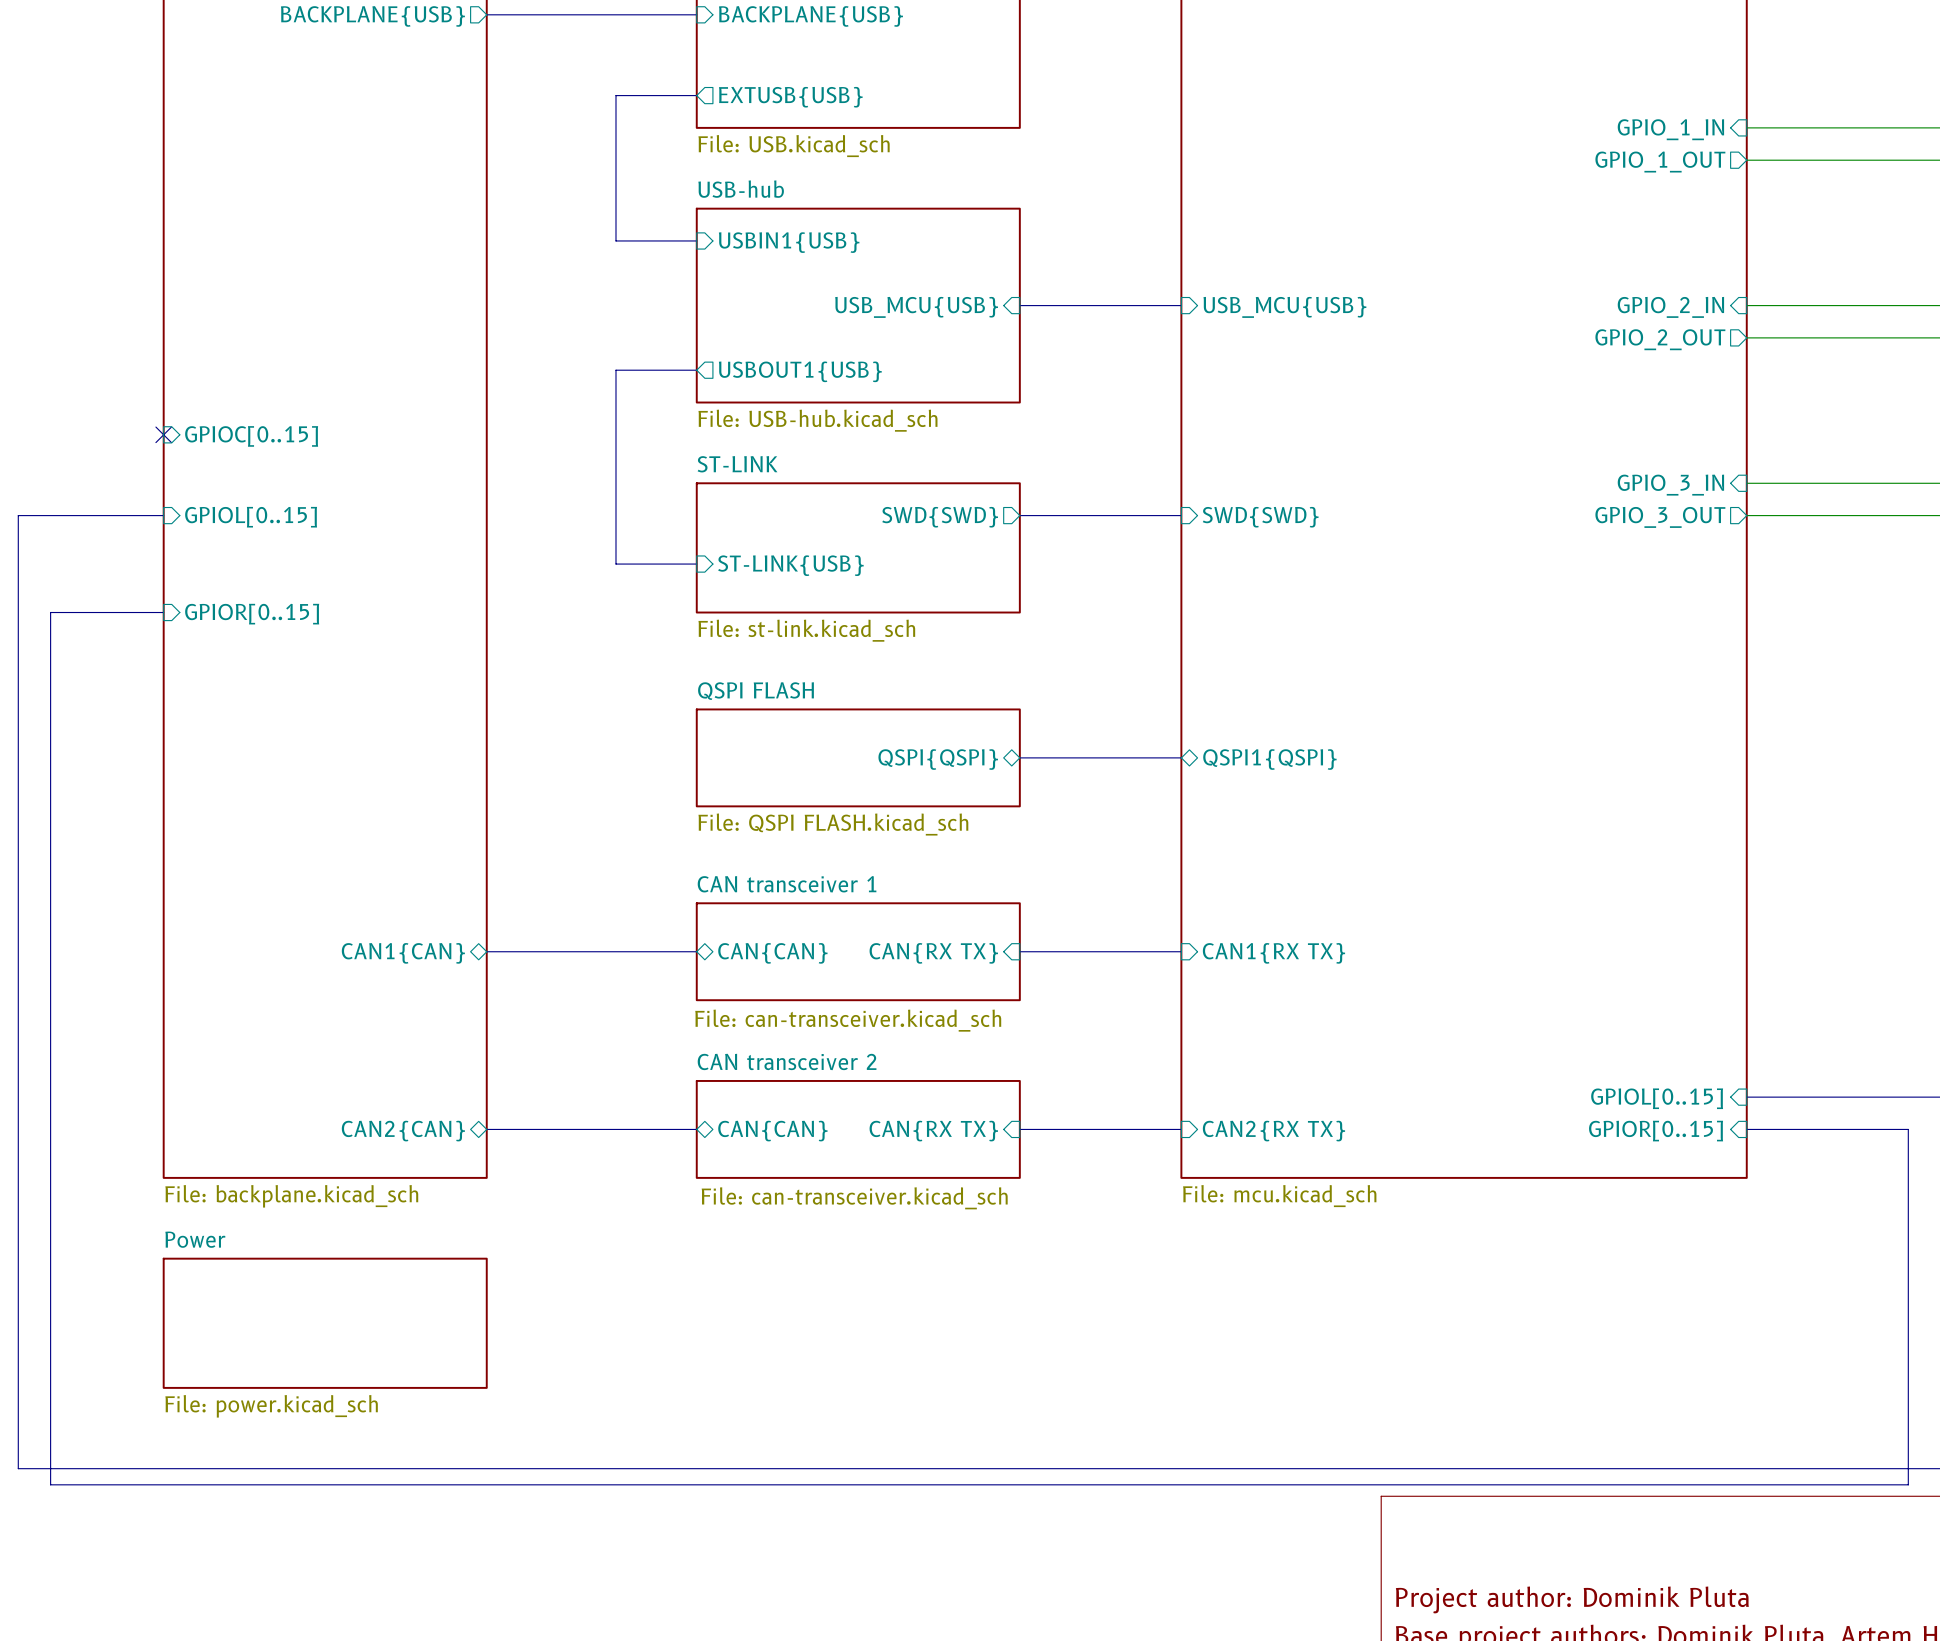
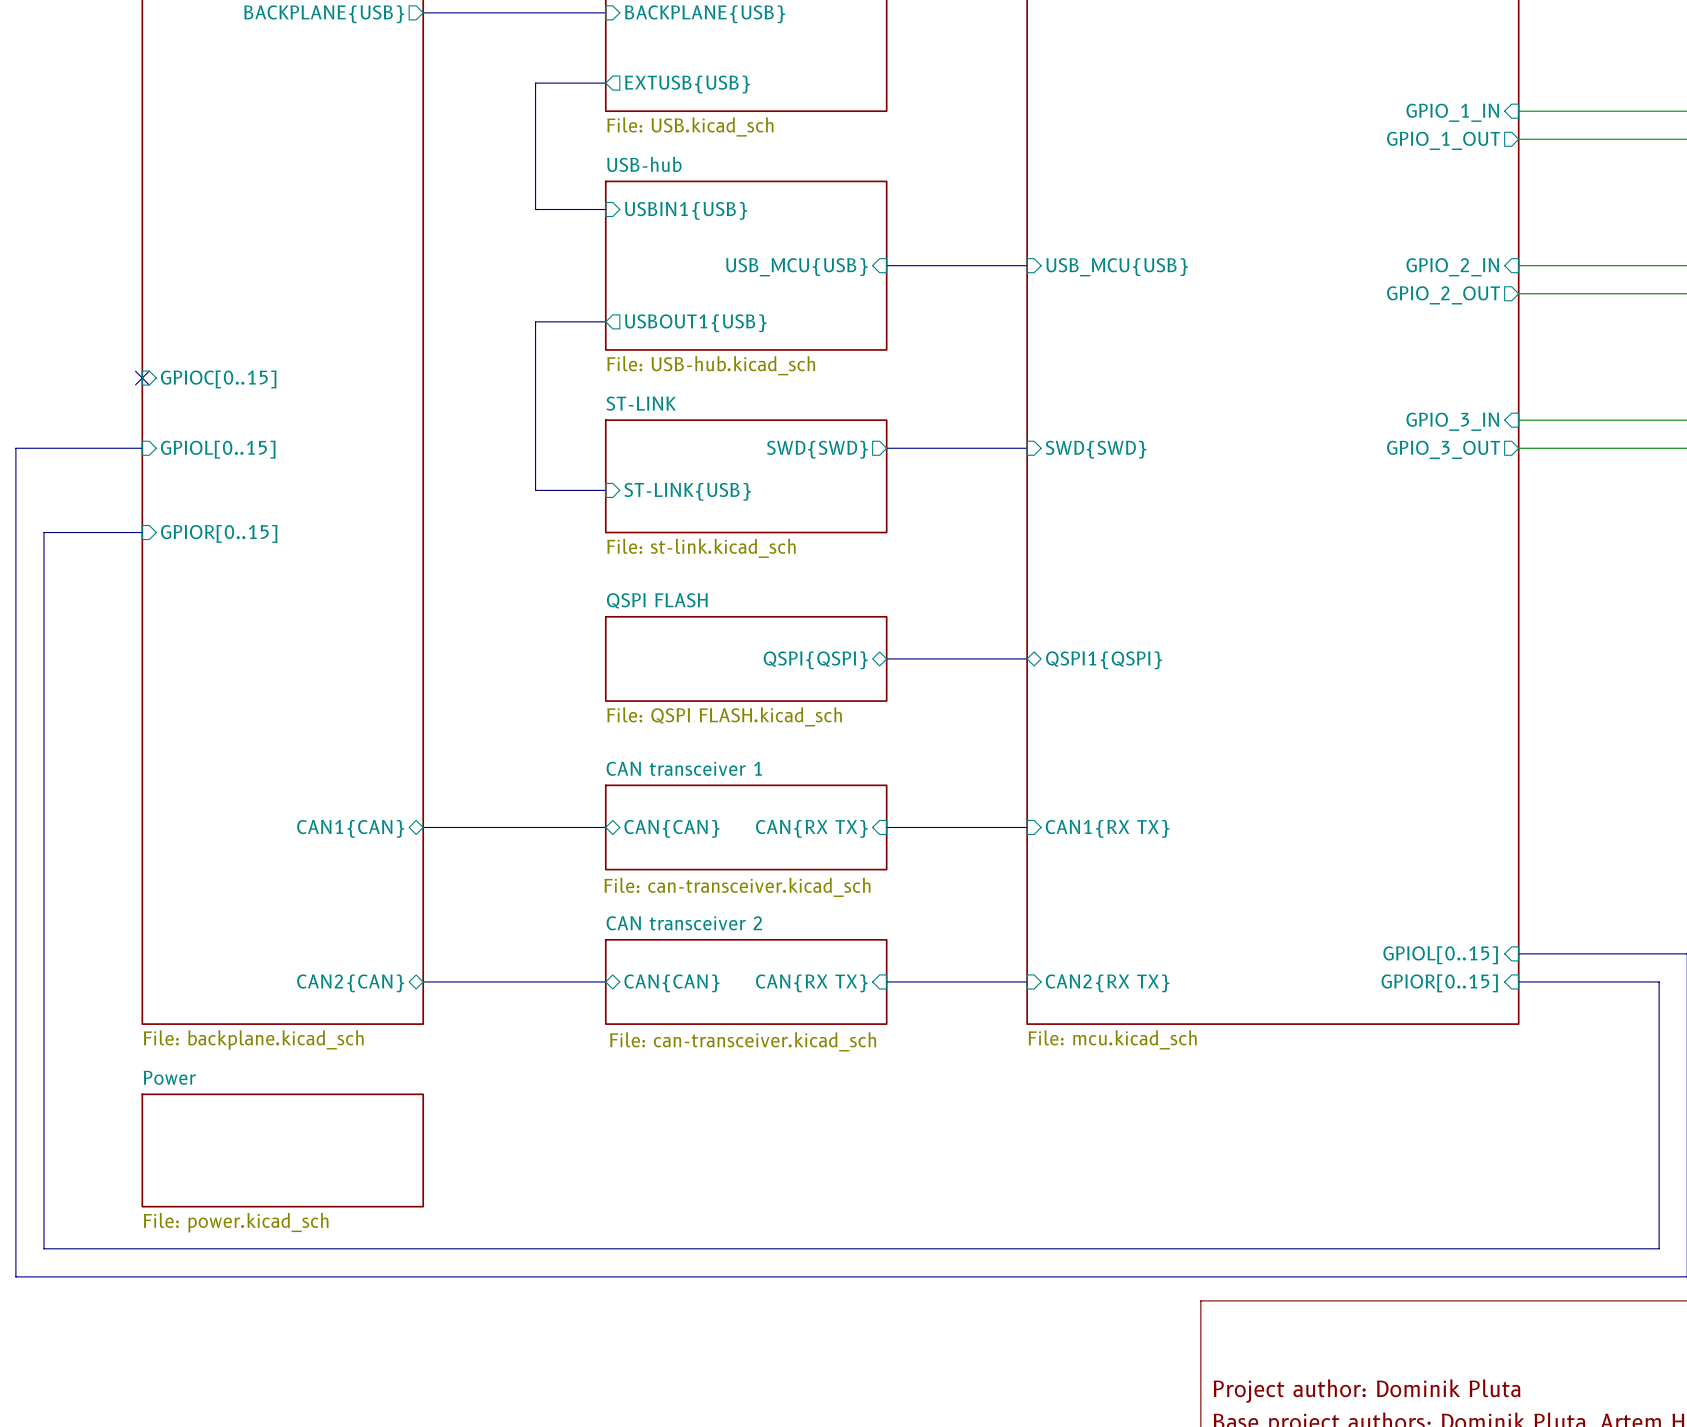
bus: (50, 1436) (50, 1484) (1908, 1484) (1908, 1436) -> (44, 1248) (1659, 1248)

